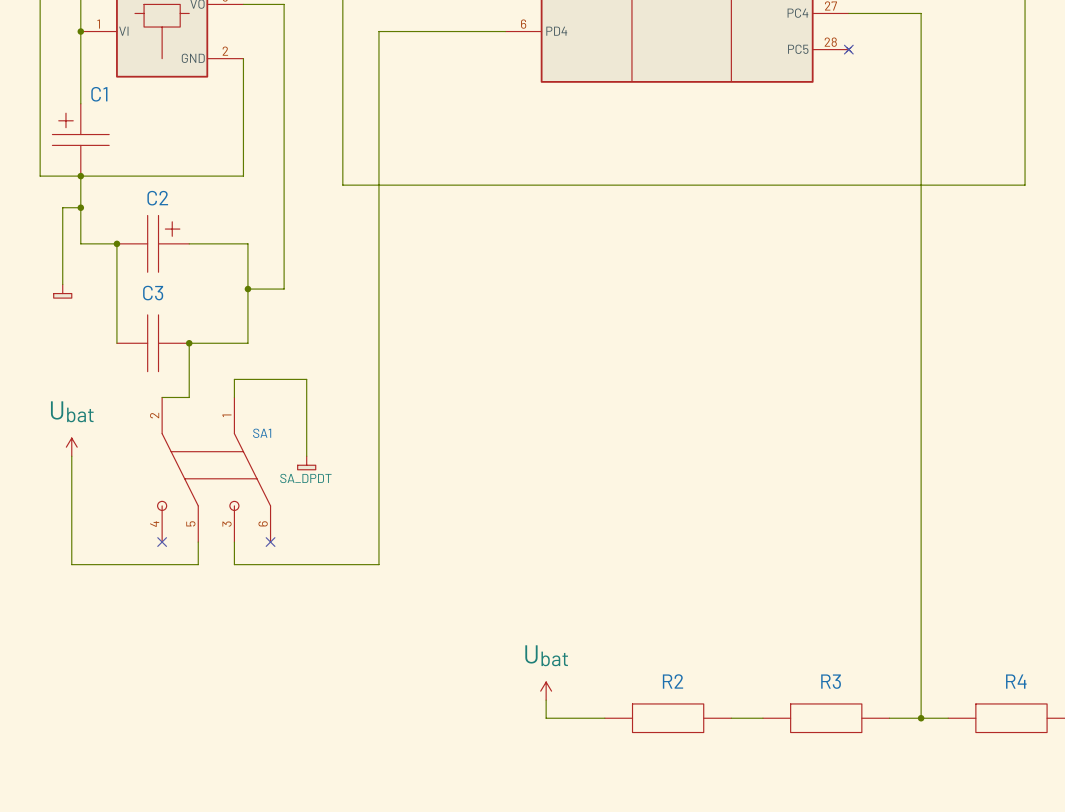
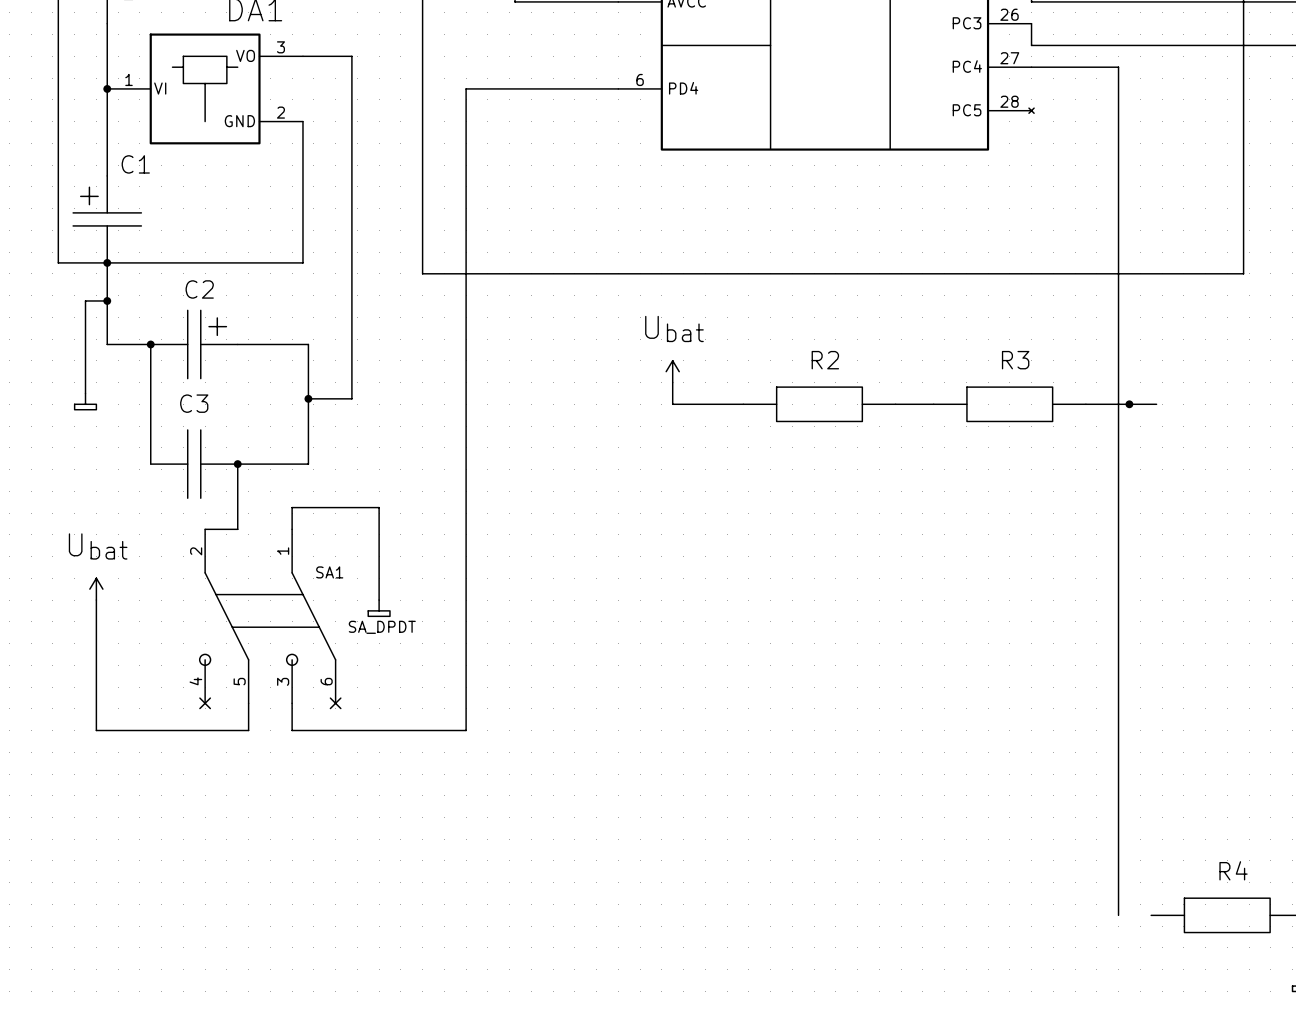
no-connect mark: (848, 49) -> none
power symbol: none -> Ubat (672, 371)
wire: none -> (672, 382) (672, 404) (743, 404)
wire: none -> (895, 404) (933, 404)
wire: none -> (1085, 404) (1156, 404)
junction: none -> (1129, 404)
power symbol: Ubat (546, 691) -> none
wire: (546, 700) (546, 718) (604, 718) -> none
R2 position: (668, 718) -> (819, 404)
wire: (731, 718) (762, 718) -> none
R3 position: (826, 718) -> (1009, 404)
wire: (889, 718) (948, 718) -> none
junction: (921, 718) -> none

